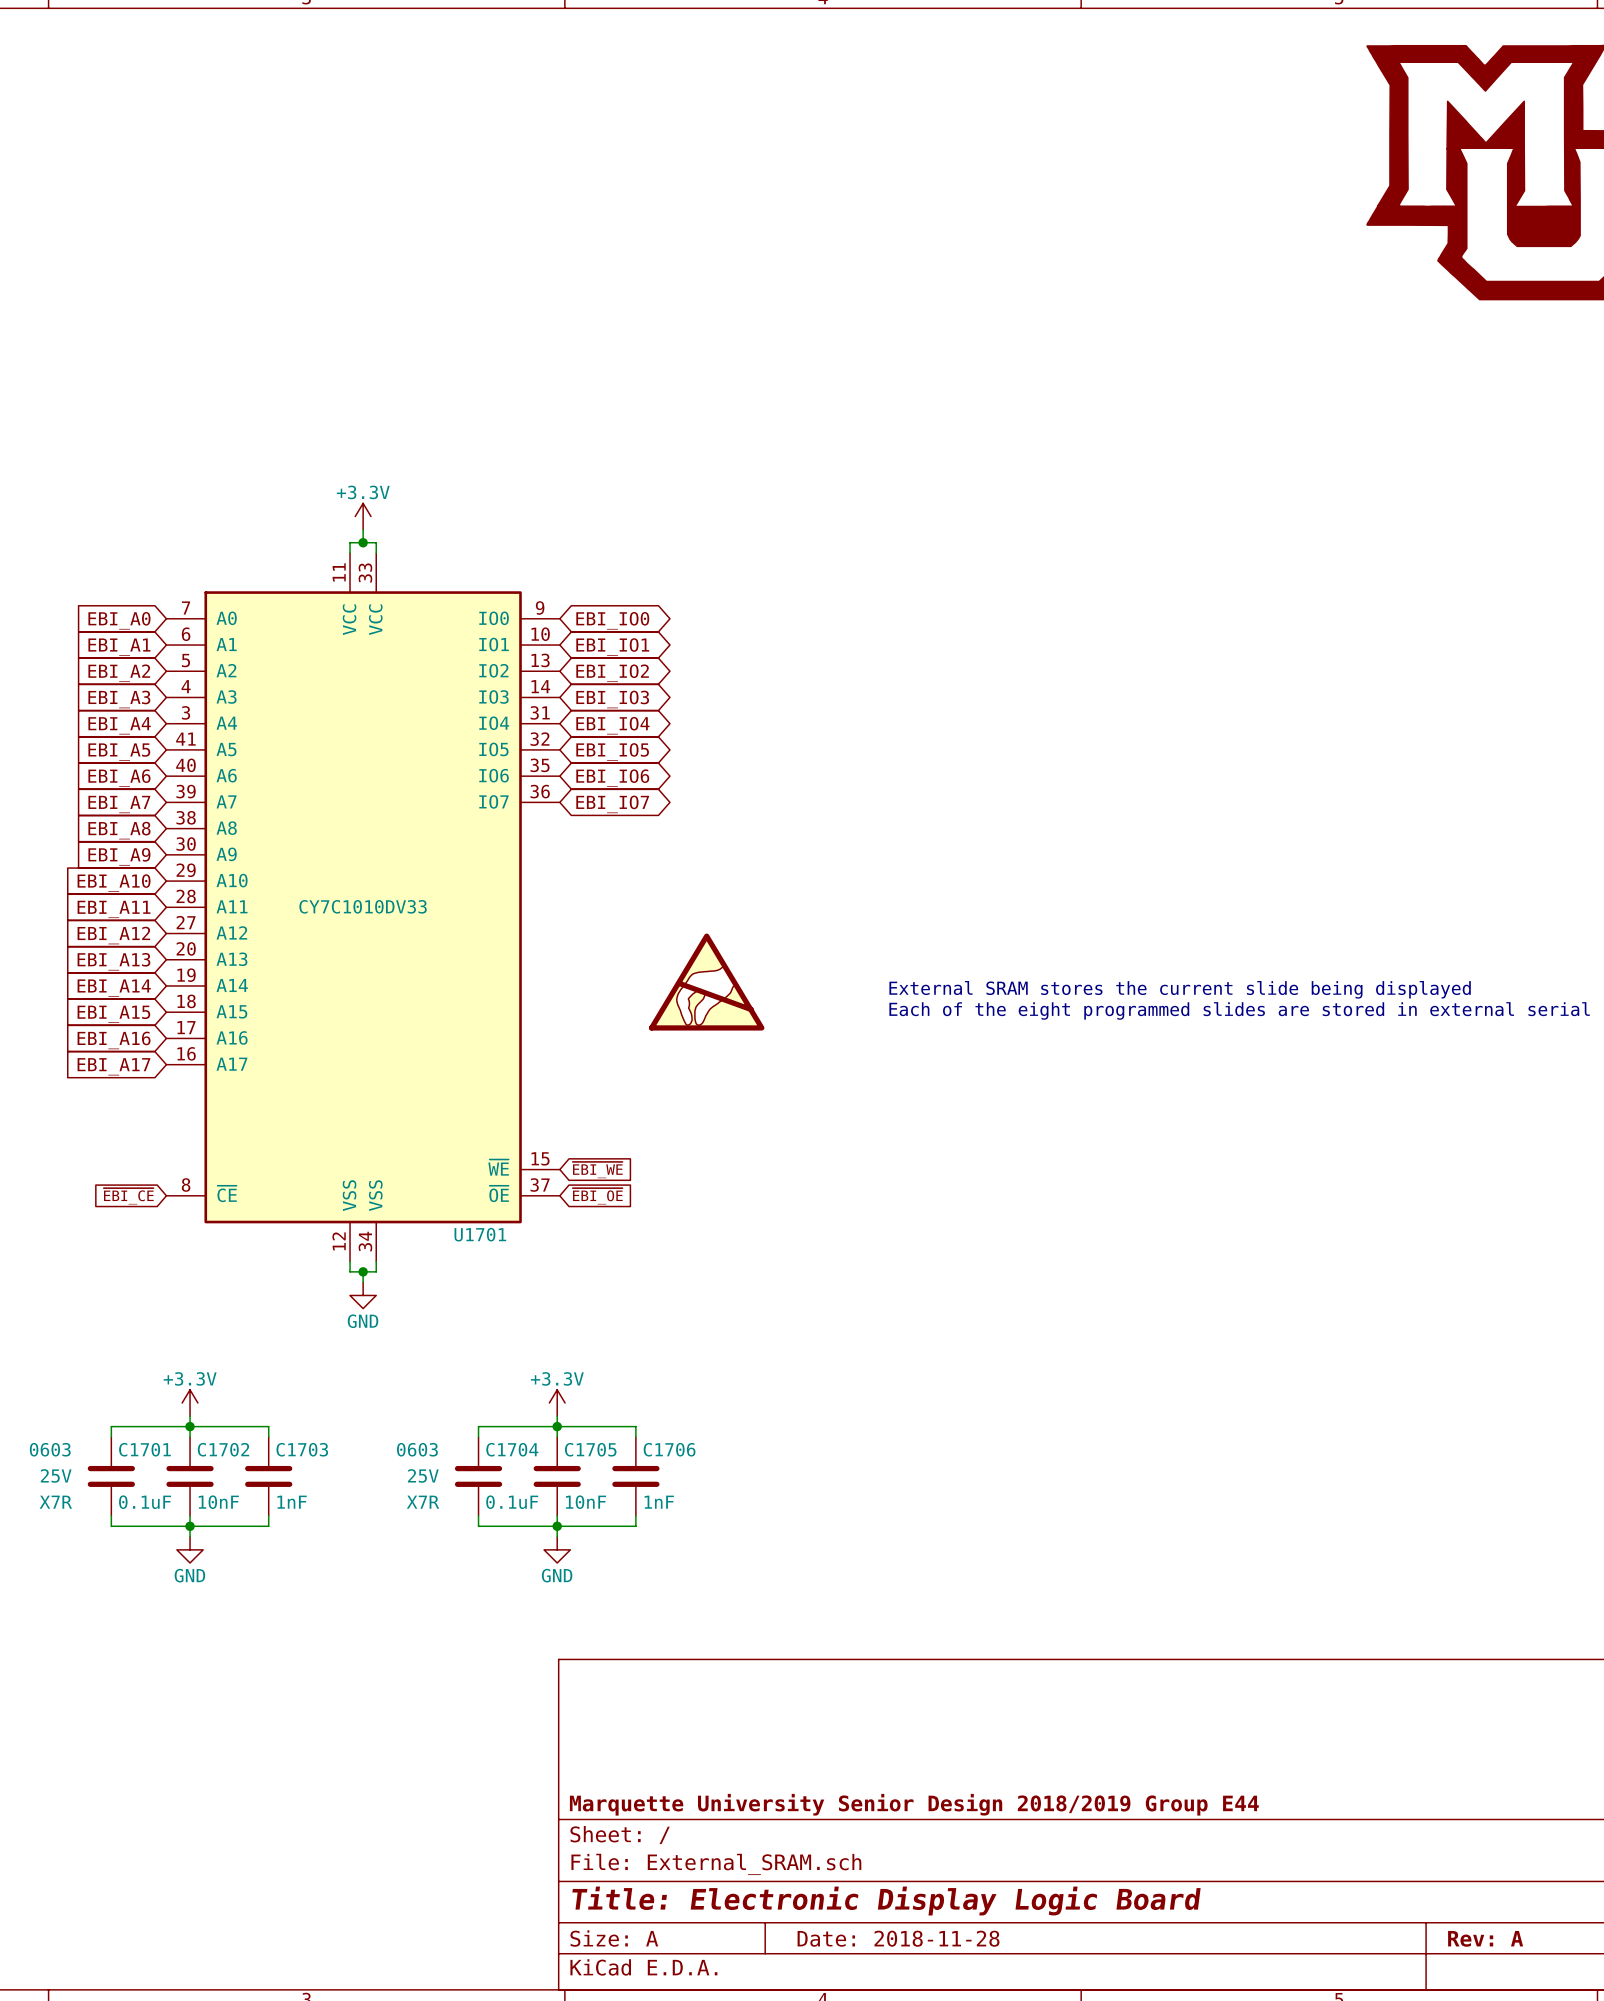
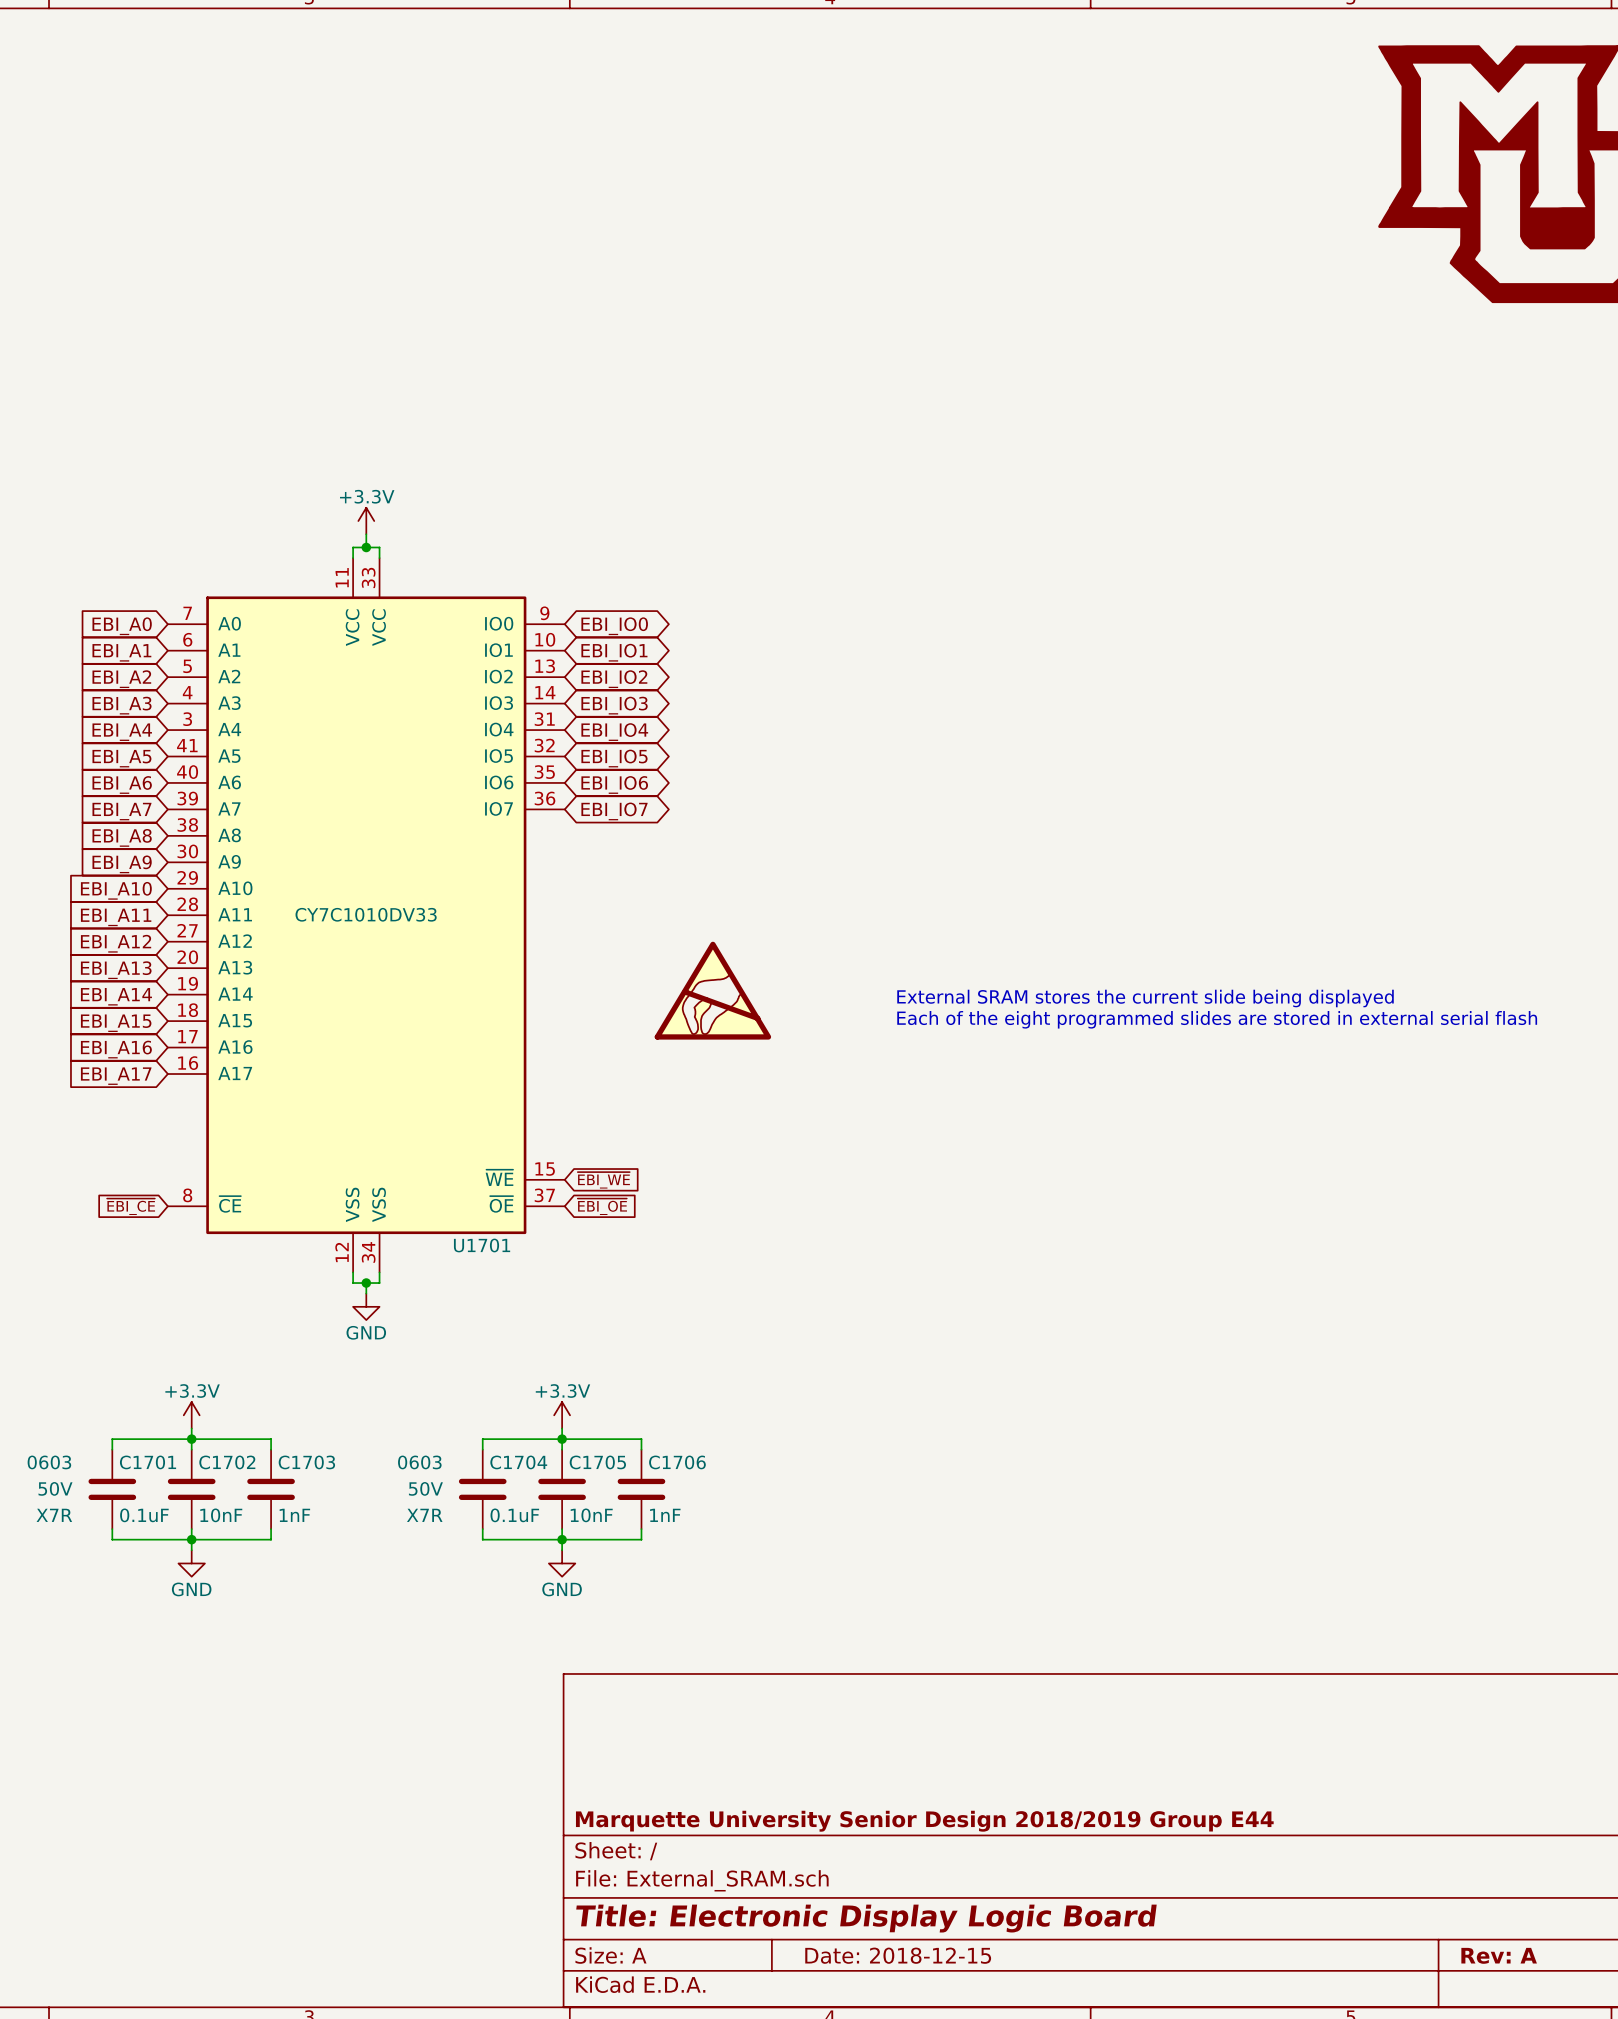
C1701 text: 25V (56, 1475) -> 50V (55, 1488)
C1704 text: 25V (423, 1475) -> 50V (425, 1488)
title block: Date: 2018-11-28 (898, 1938) -> Date: 2018-12-15 (898, 1955)

